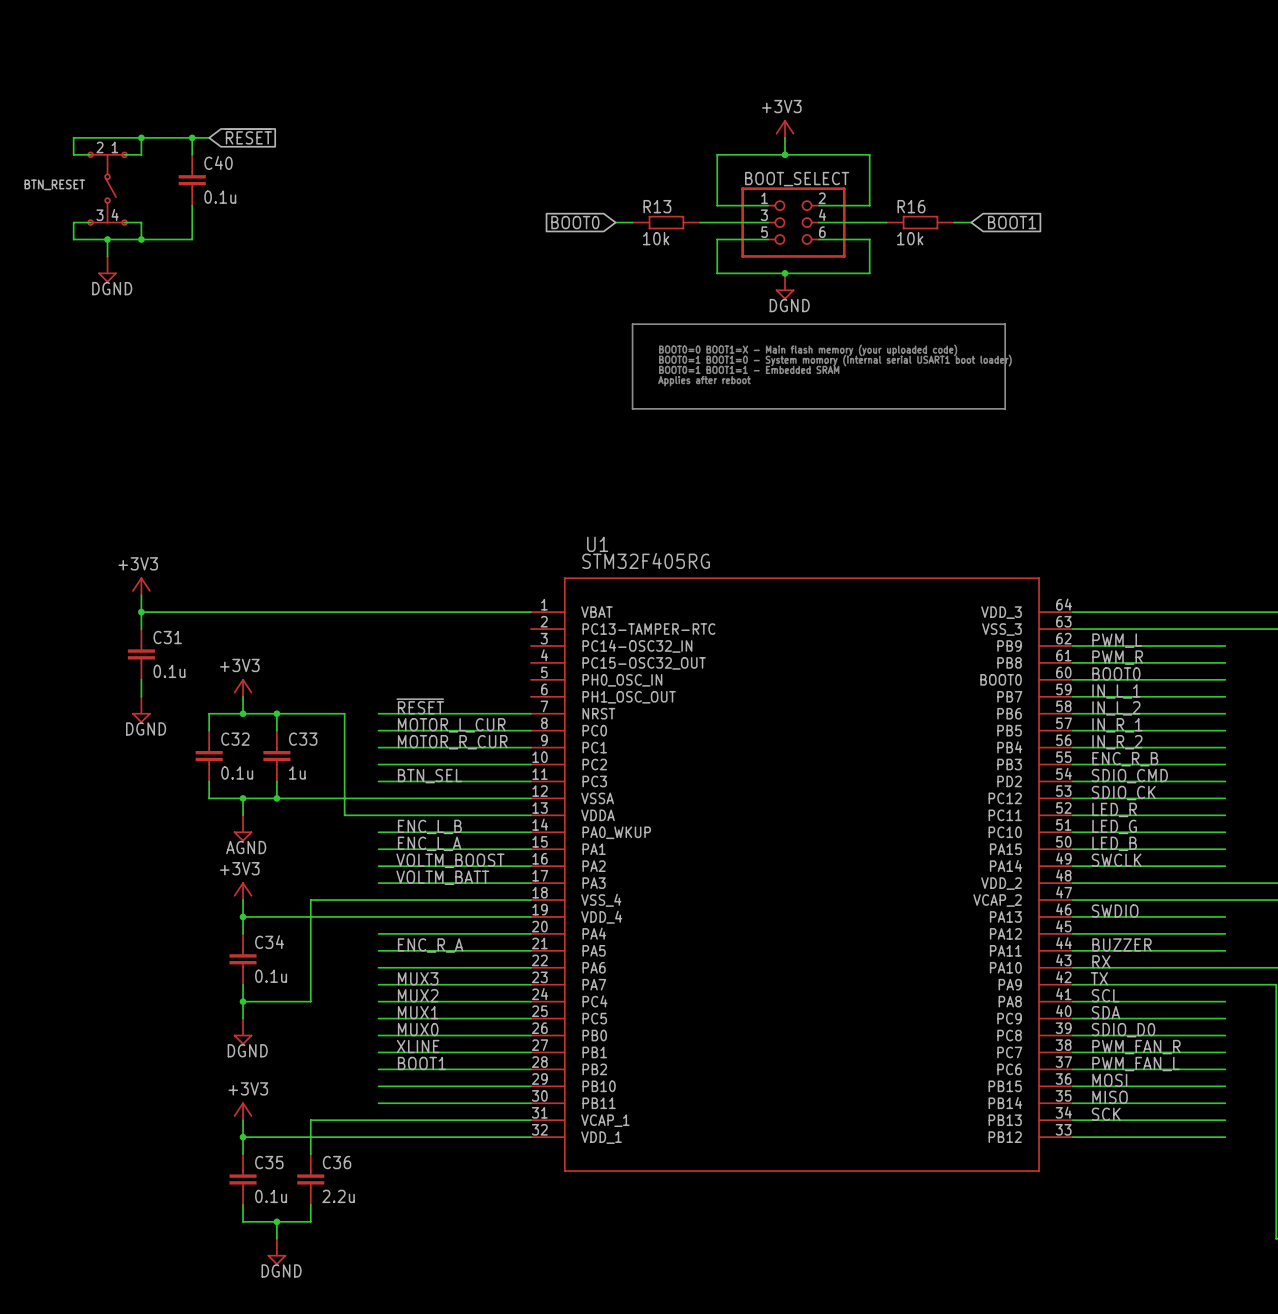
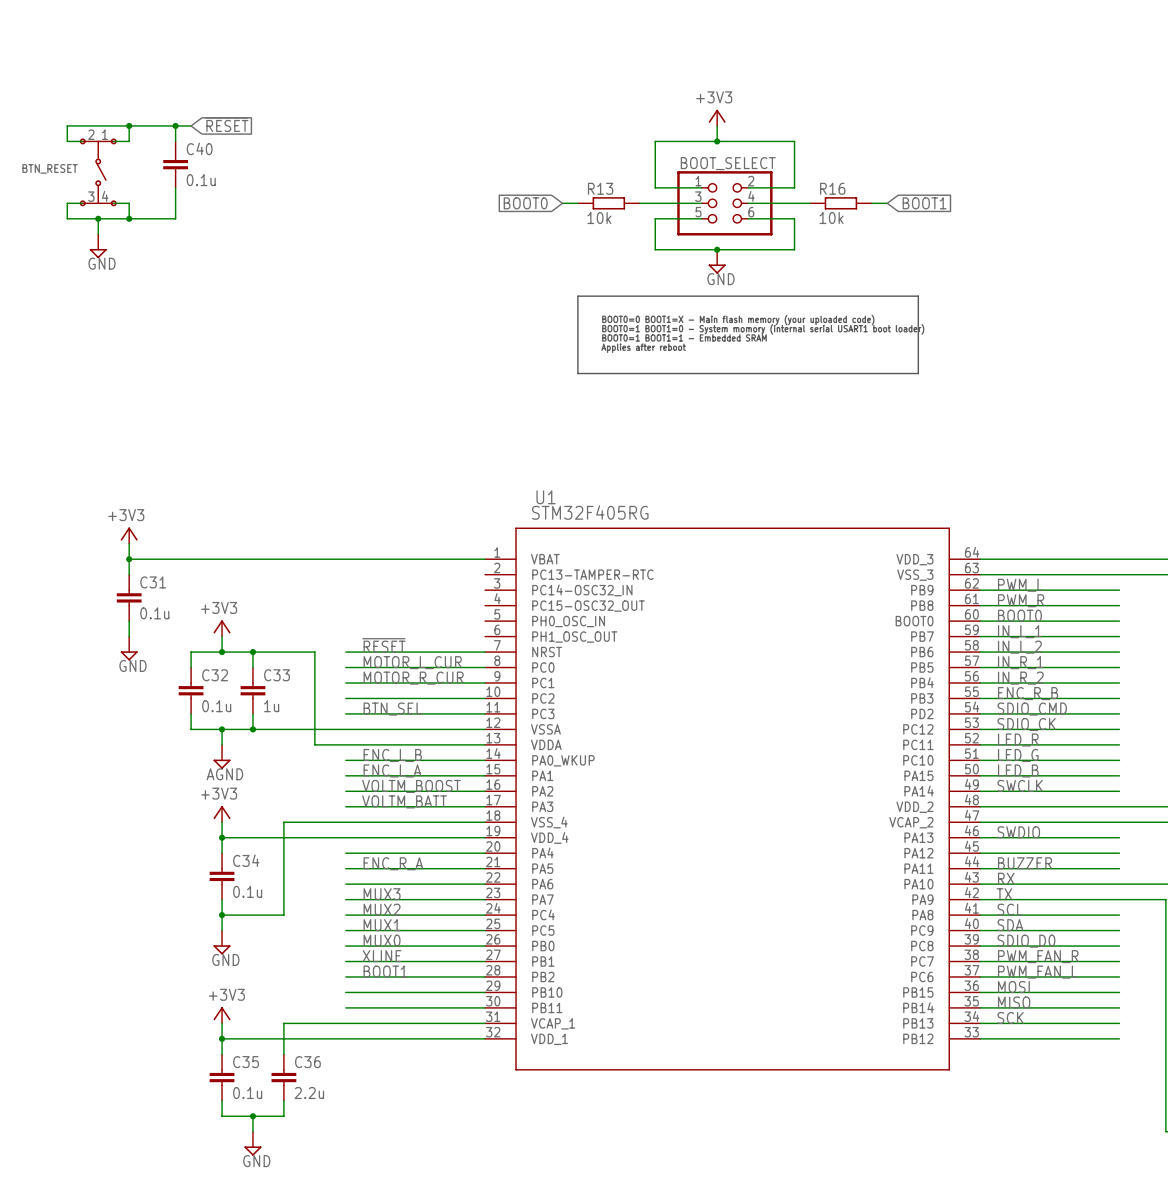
power symbol: DGND (107, 269) -> GND (98, 246)
power symbol: DGND (785, 286) -> GND (717, 261)
power symbol: DGND (141, 709) -> GND (129, 648)
power symbol: DGND (243, 1031) -> GND (222, 942)
power symbol: DGND (276, 1251) -> GND (252, 1143)

